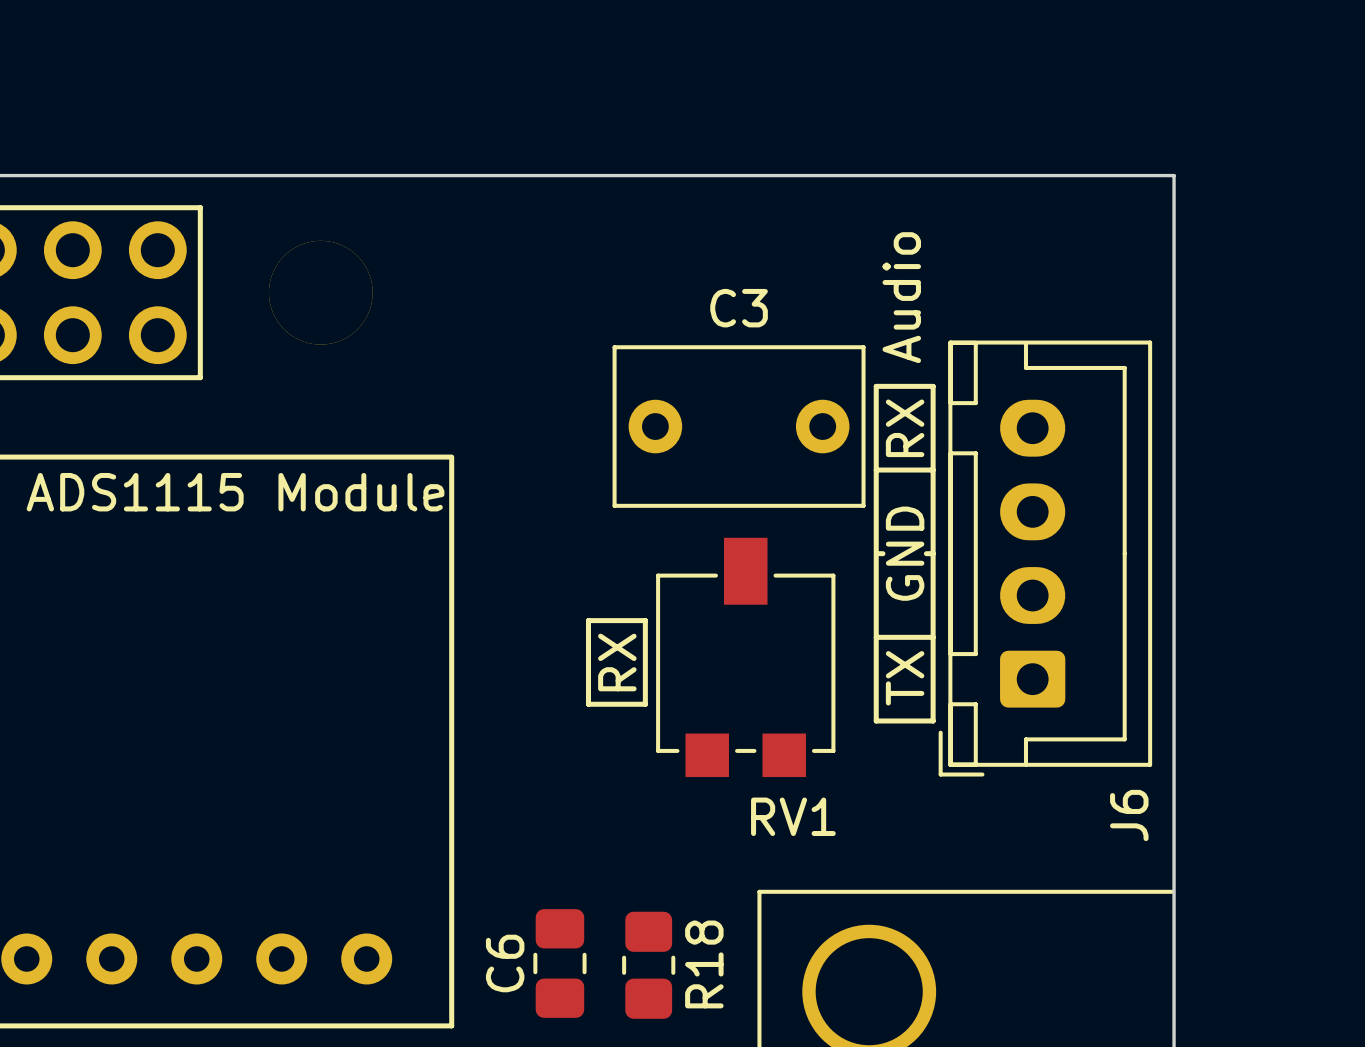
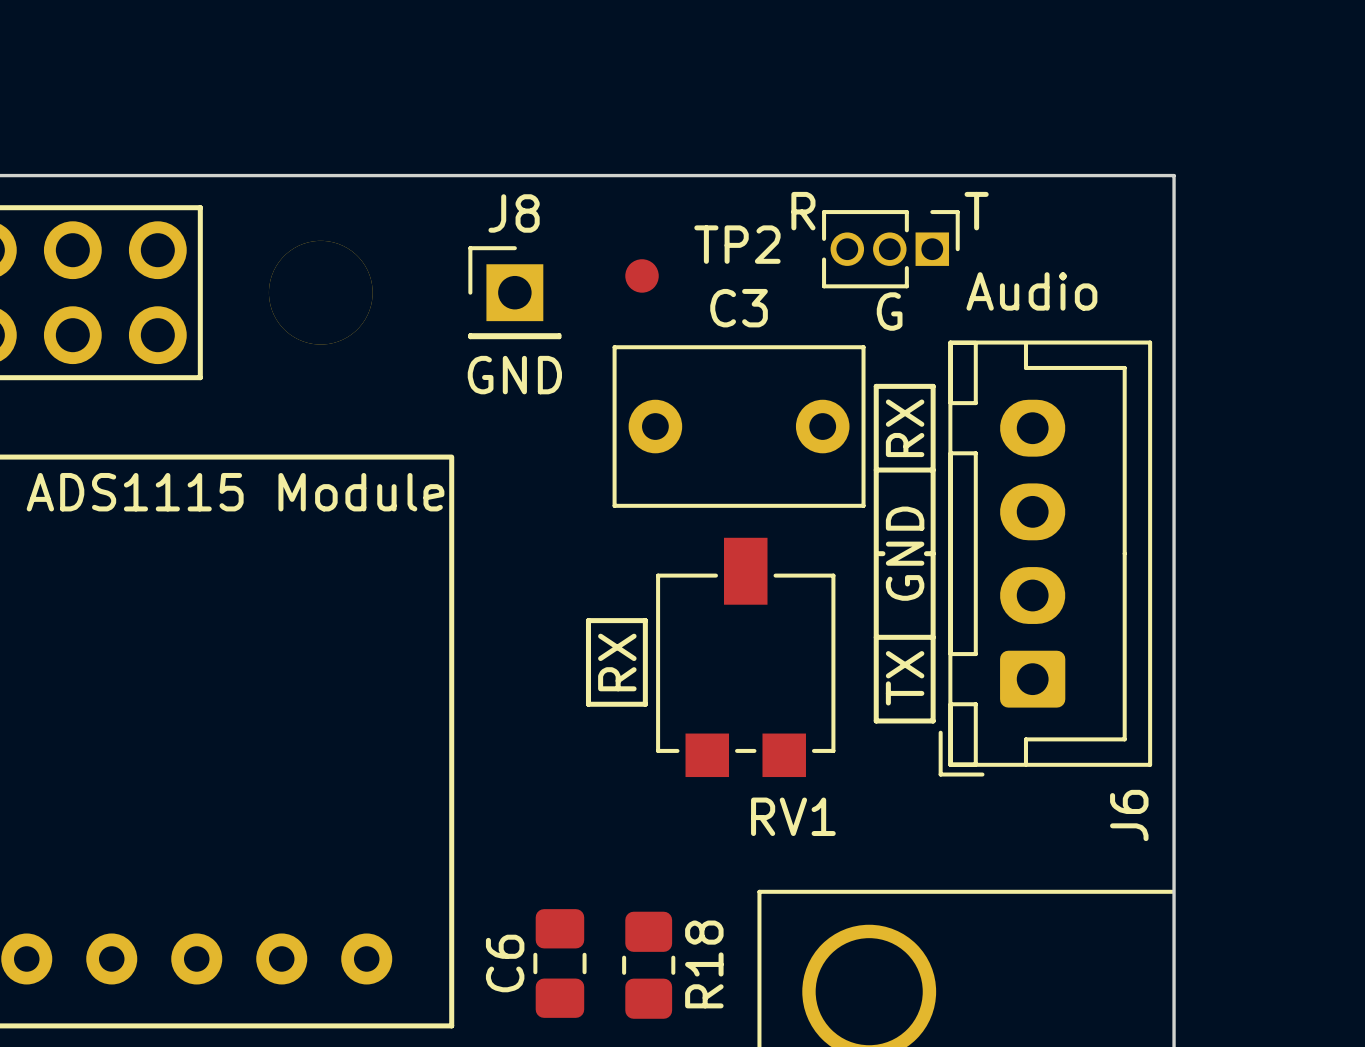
text: none -> R (803, 211)
text: none -> T (976, 211)
TP2: none -> (890, 249)
part: none -> (642, 275)
text: none -> Audio (1031, 291)
J8: none -> (514, 292)
text: Audio (901, 297) -> G (889, 311)
text: none -> GND (514, 375)

